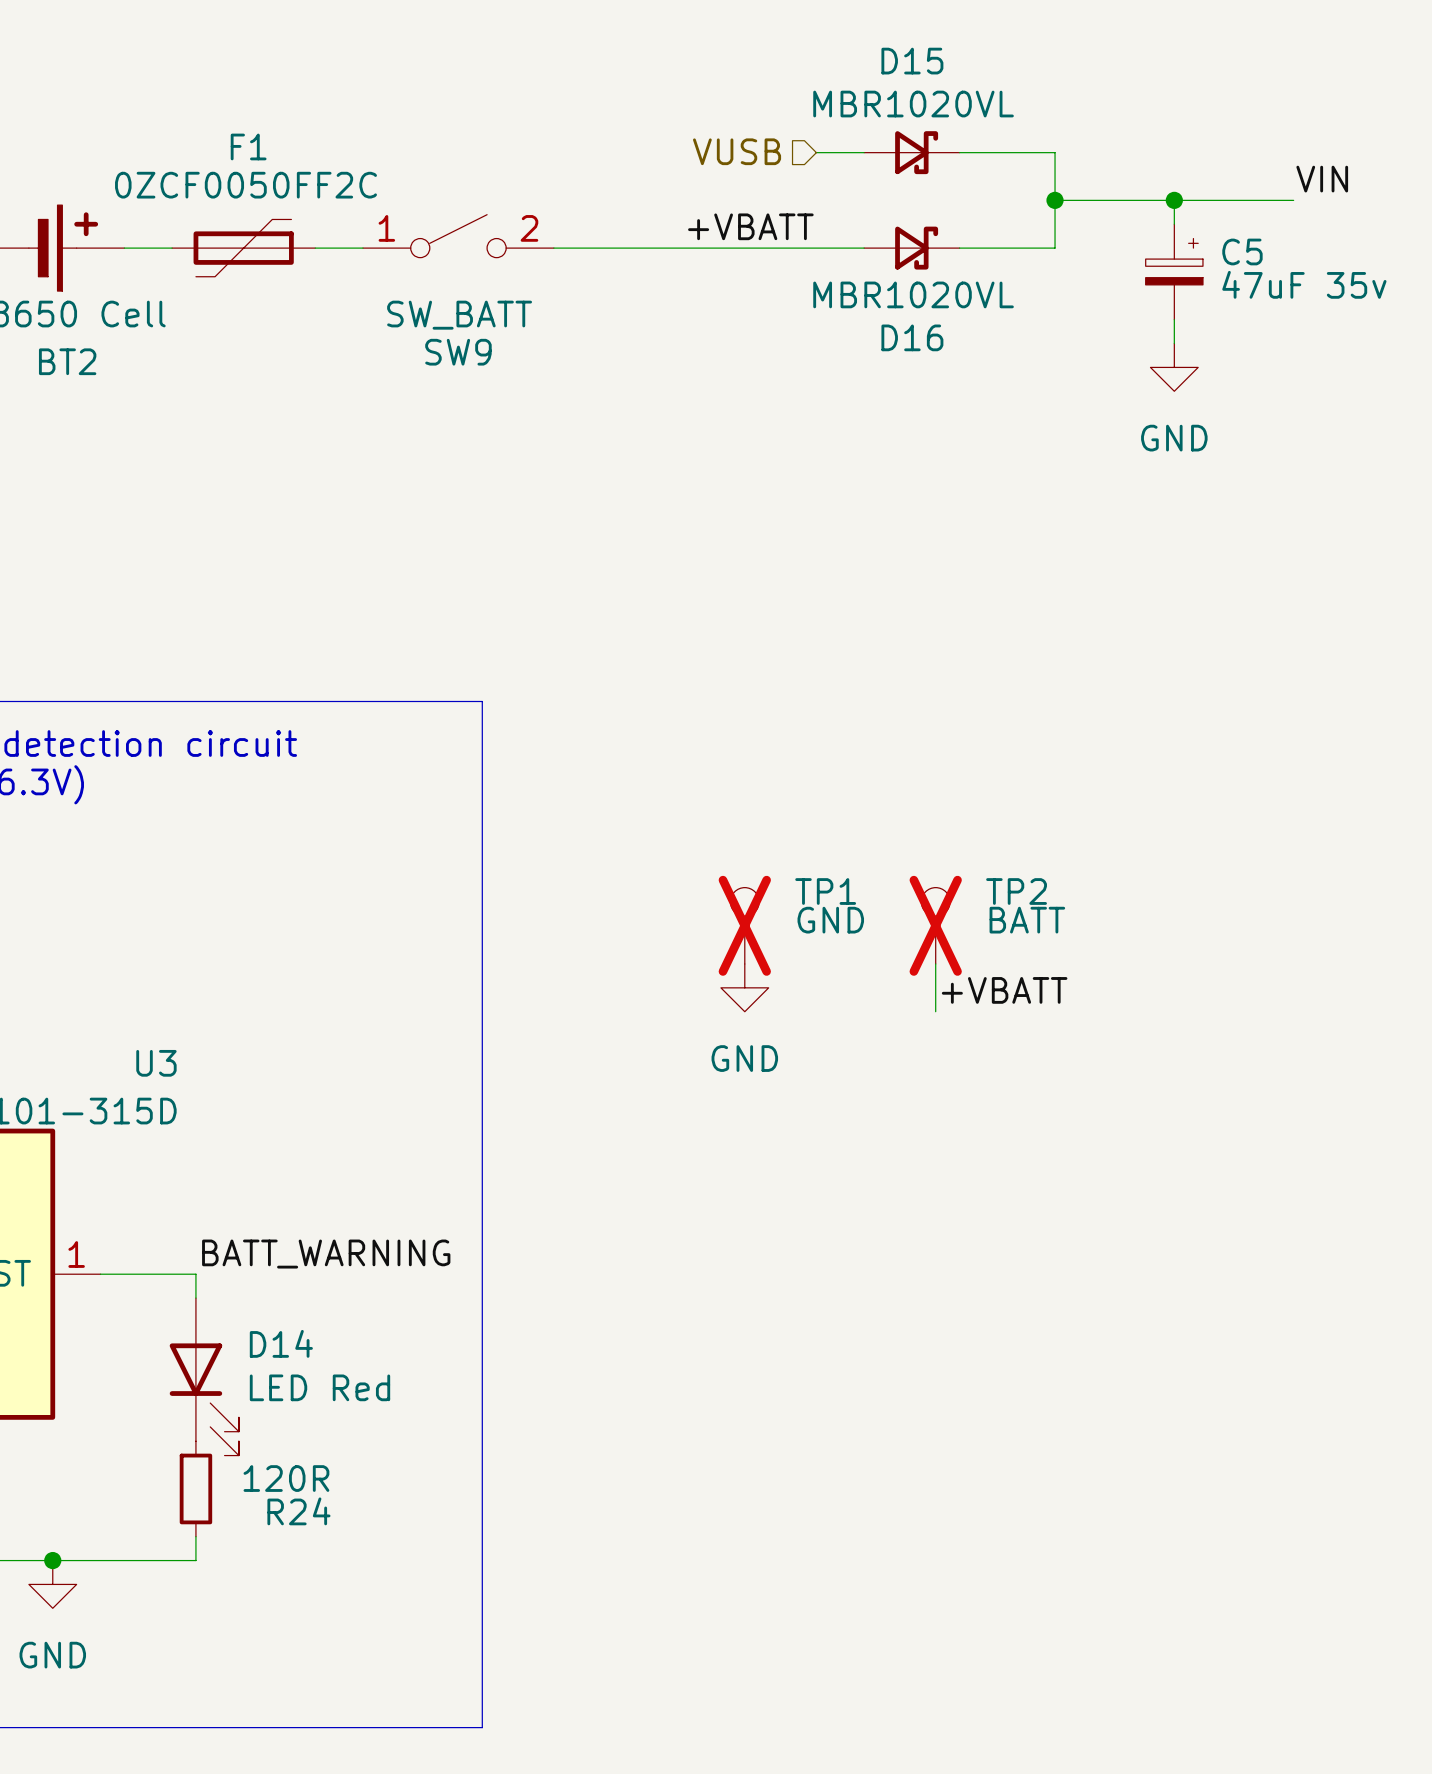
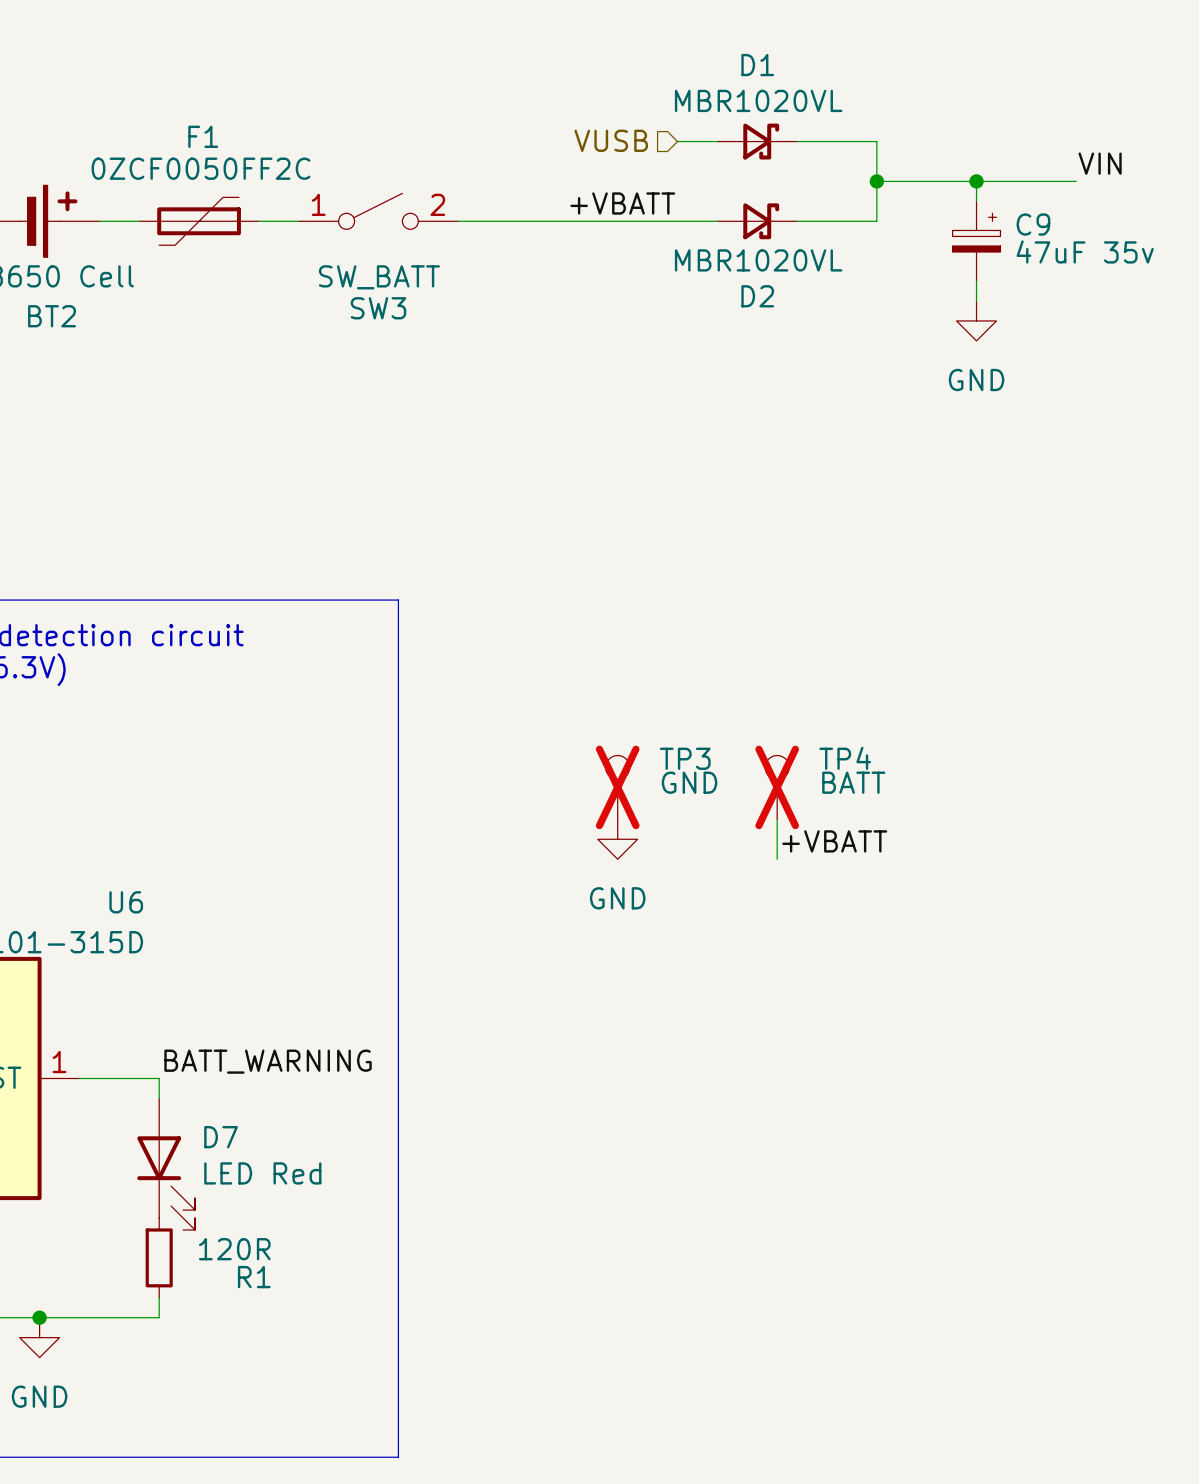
D15 name: D15 (912, 61) -> D1 (757, 65)
C5 name: C5 (1242, 251) -> C9 (1033, 224)
D16 name: D16 (912, 337) -> D2 (757, 296)
SW9 name: SW9 (458, 352) -> SW3 (378, 308)
TP1 name: TP1 (825, 891) -> TP3 (685, 758)
TP2 name: TP2 (1016, 891) -> TP4 (845, 758)
U3 name: U3 (156, 1063) -> U6 (126, 902)
D14 name: D14 (281, 1343) -> D7 (221, 1137)
R24 name: R24 (298, 1511) -> R1 (254, 1277)

